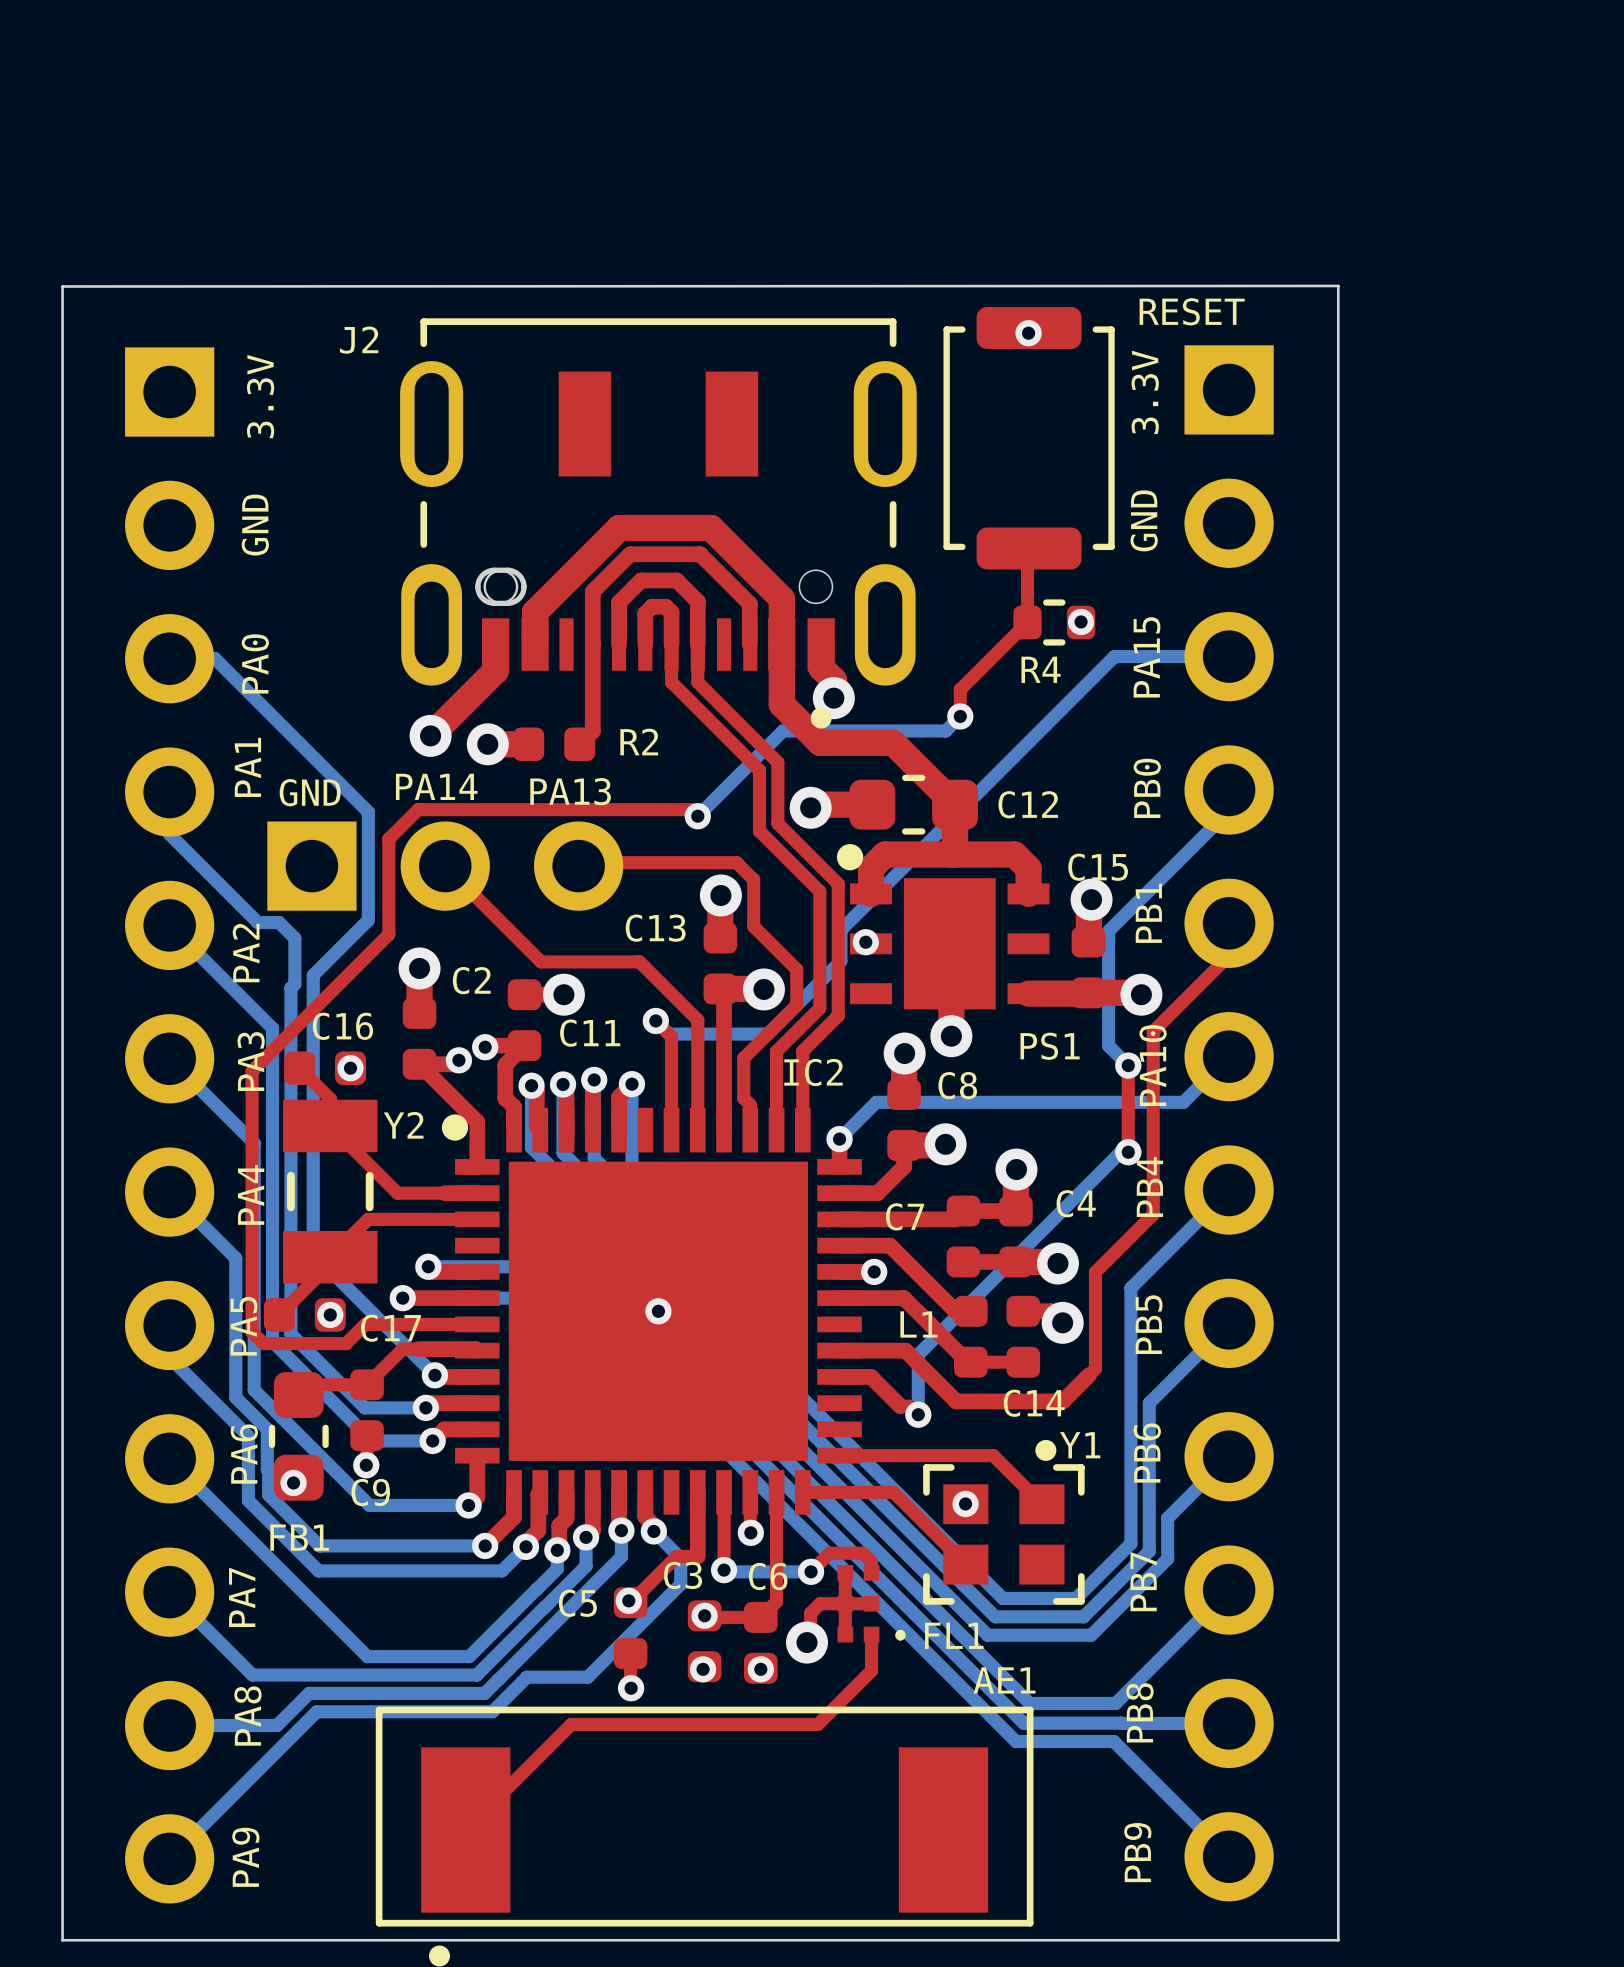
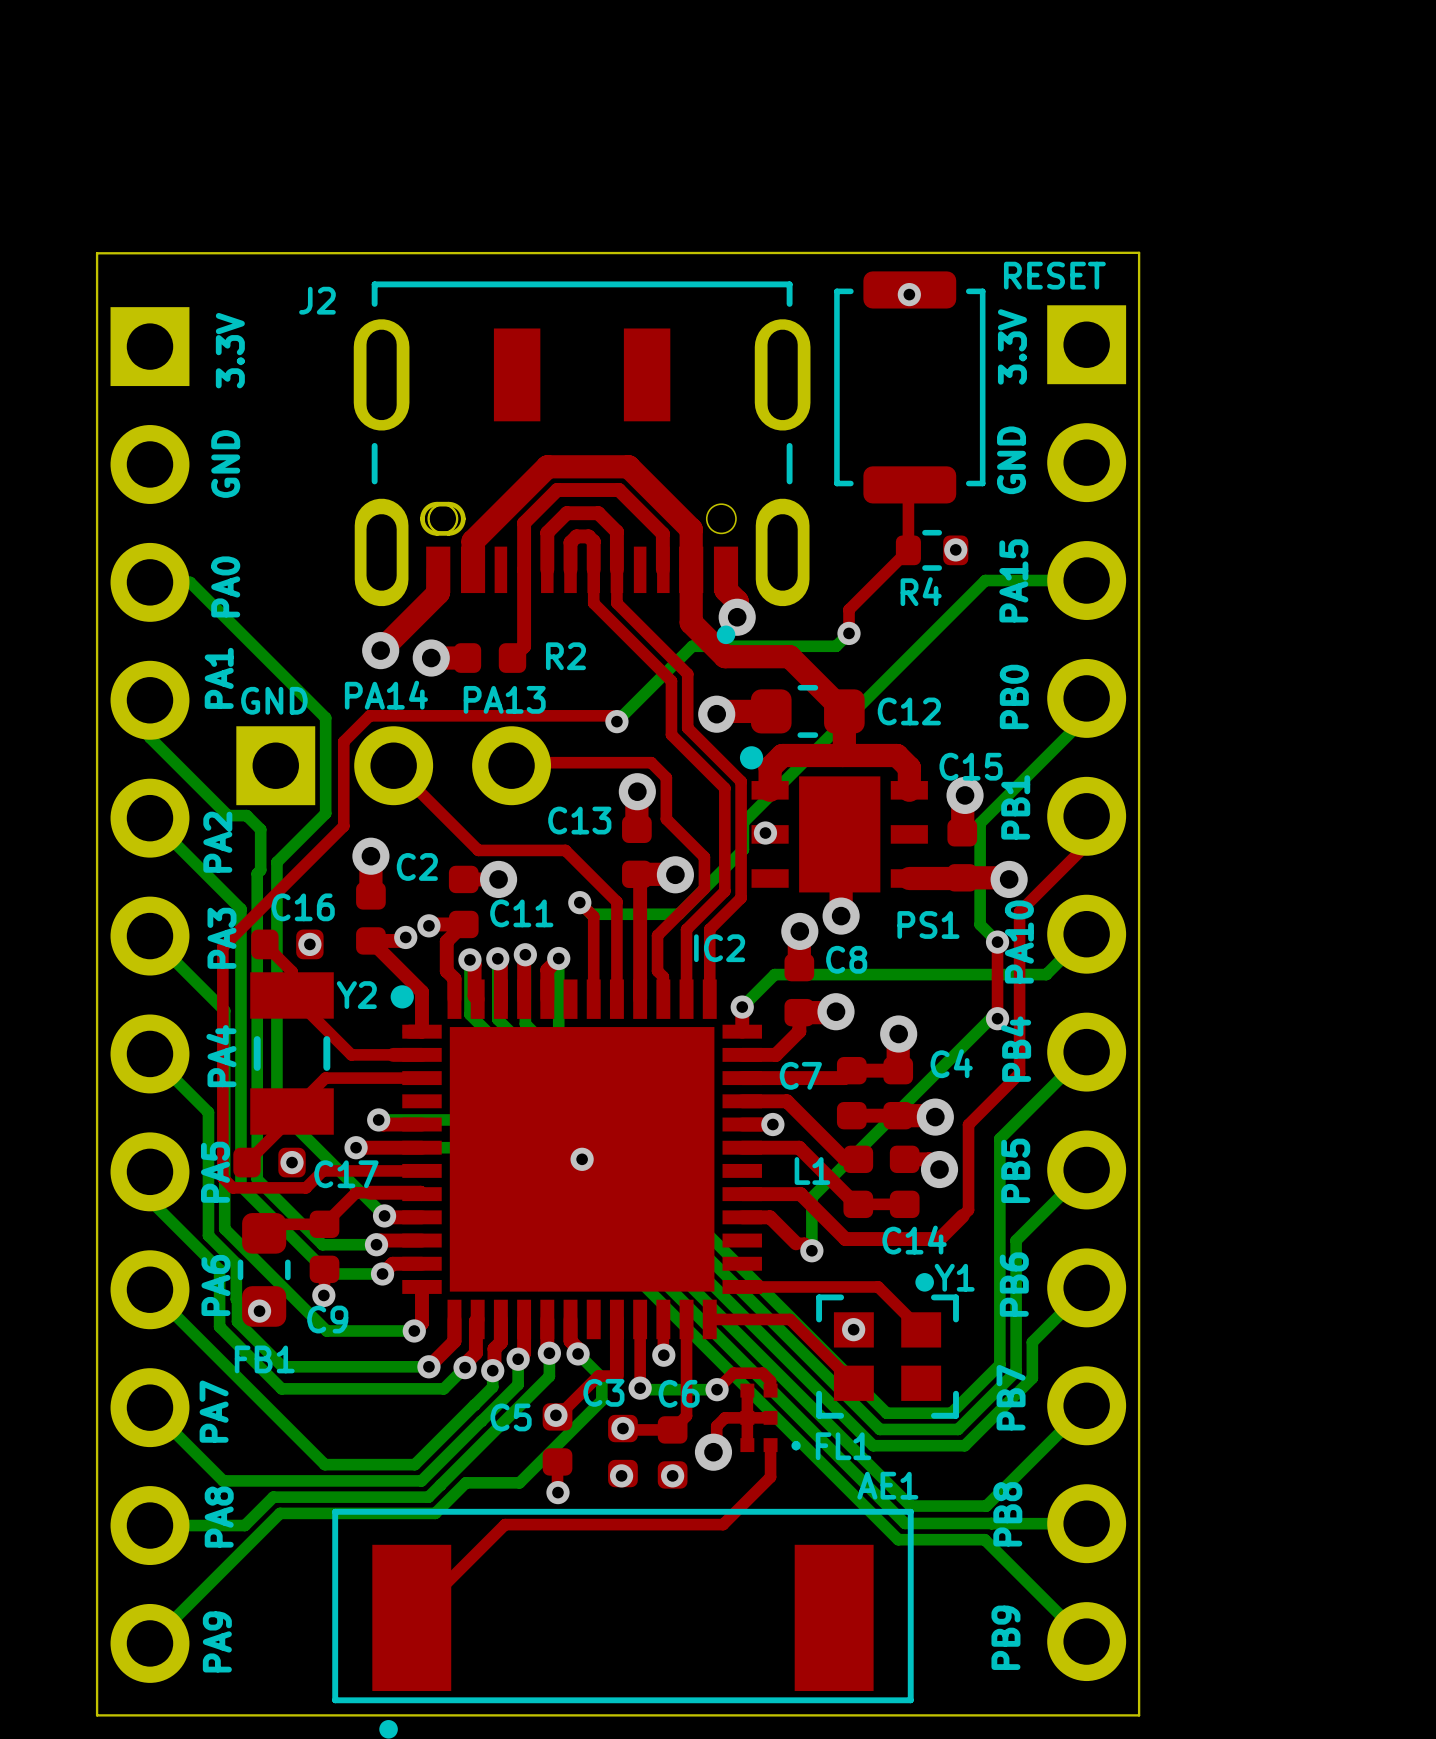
board edge: (109, 1940) (62, 1940) (62, 286) (1338, 285) (1338, 1940) (1288, 1940) -> (97, 1715) (97, 253) (1139, 252) (1139, 1715)

